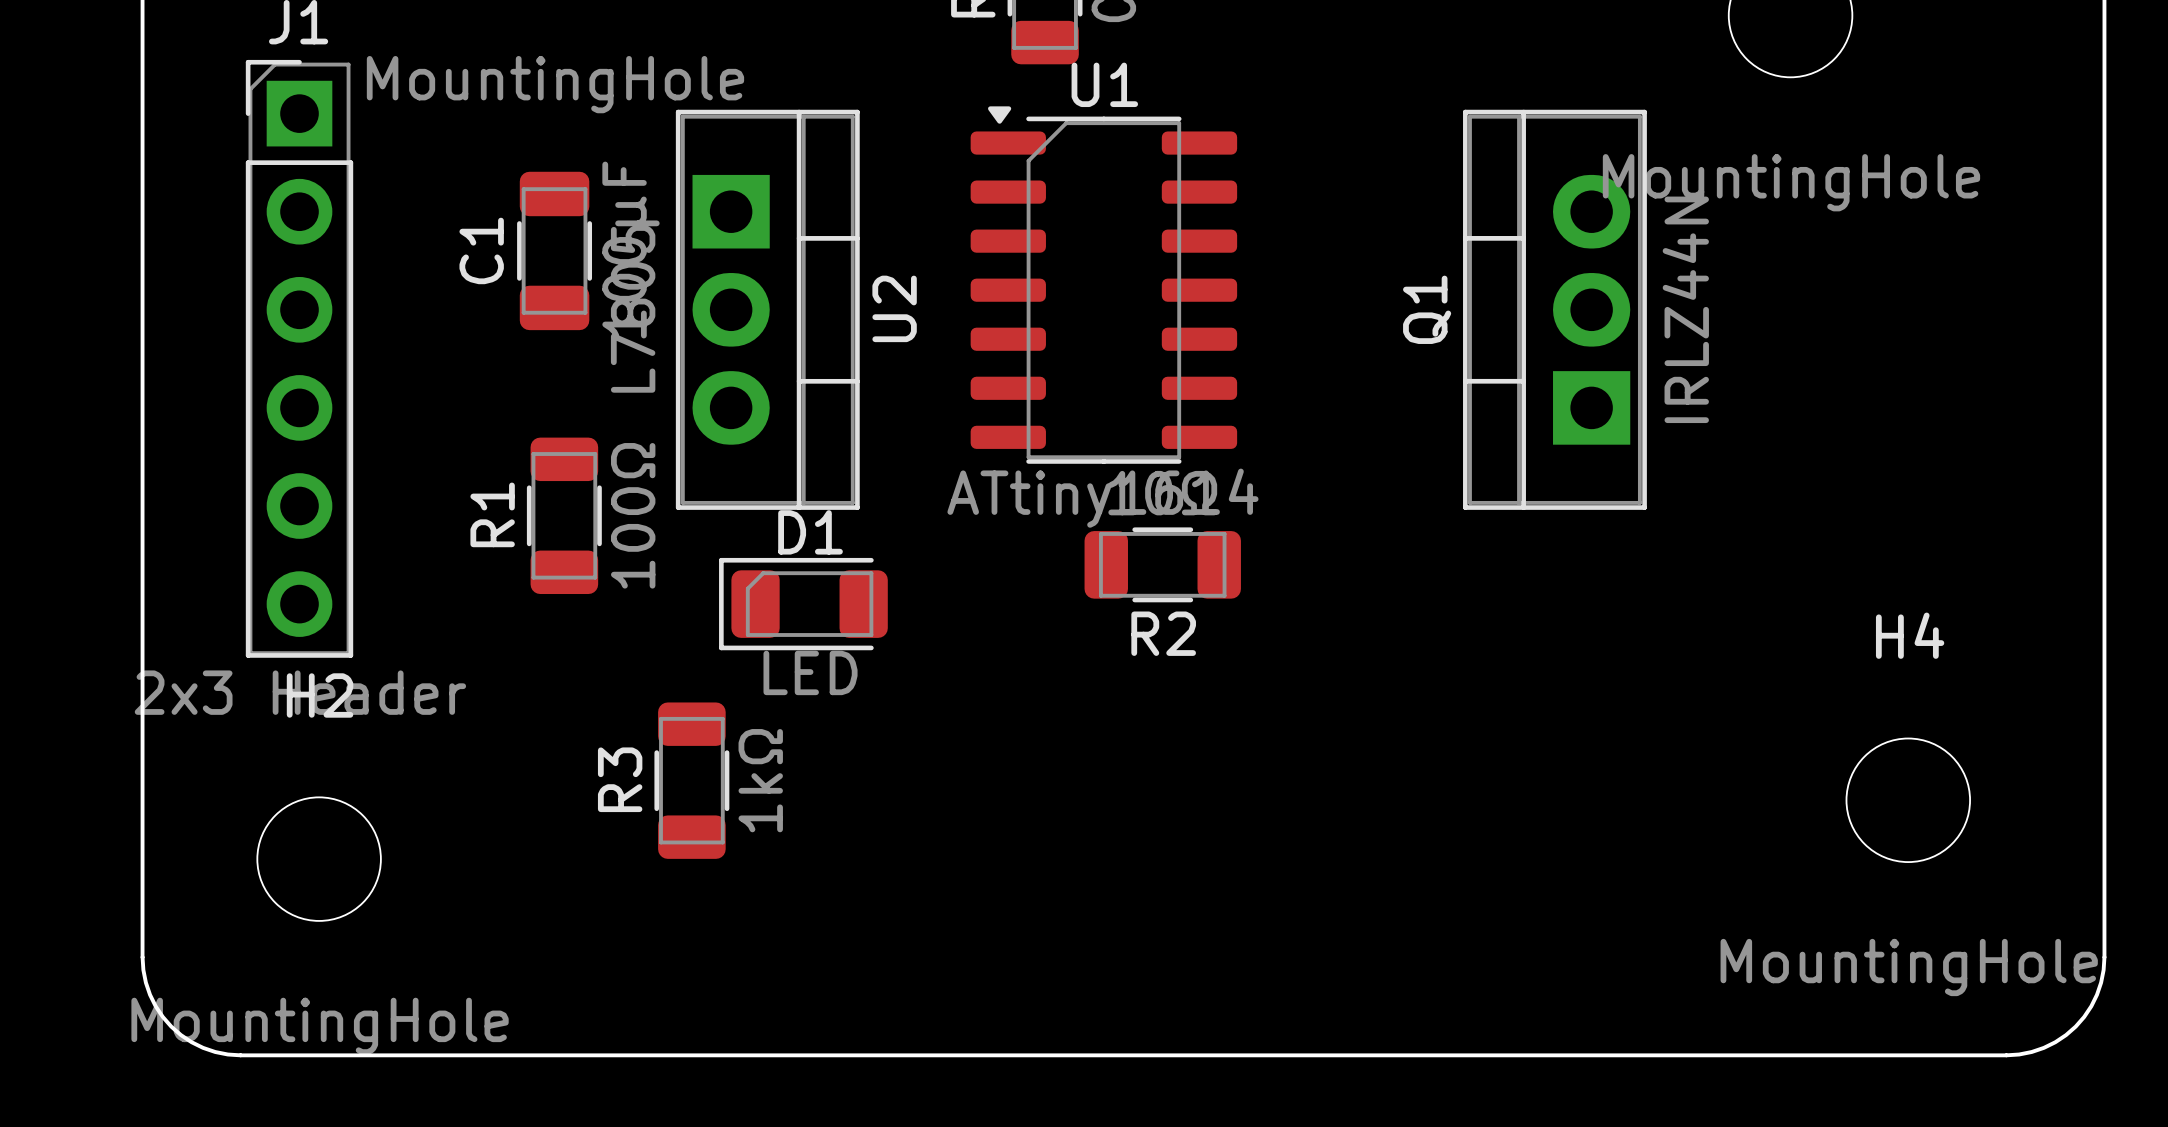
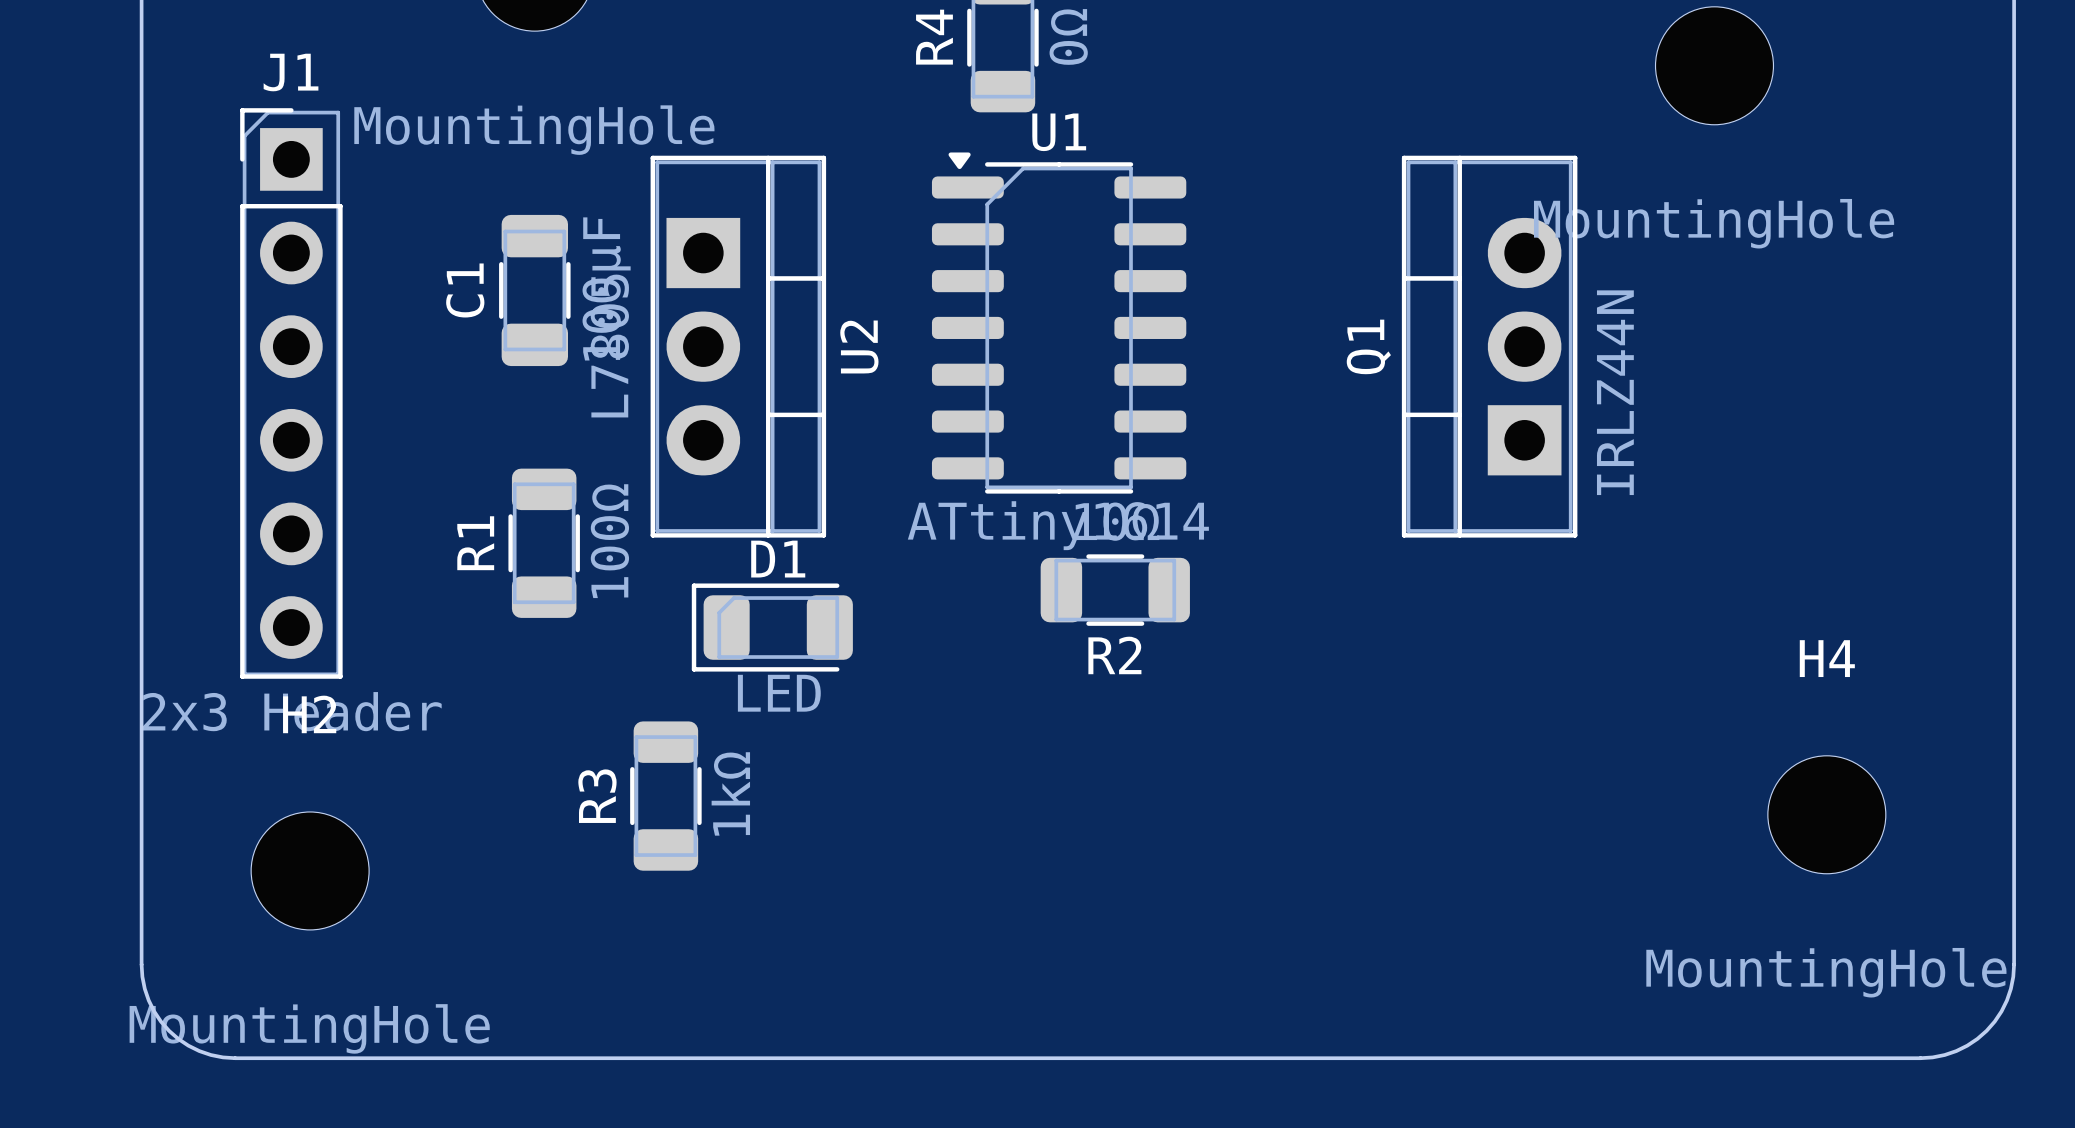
Q1 value position: IRLZ44N (1685, 309) -> IRLZ44N (1615, 392)

